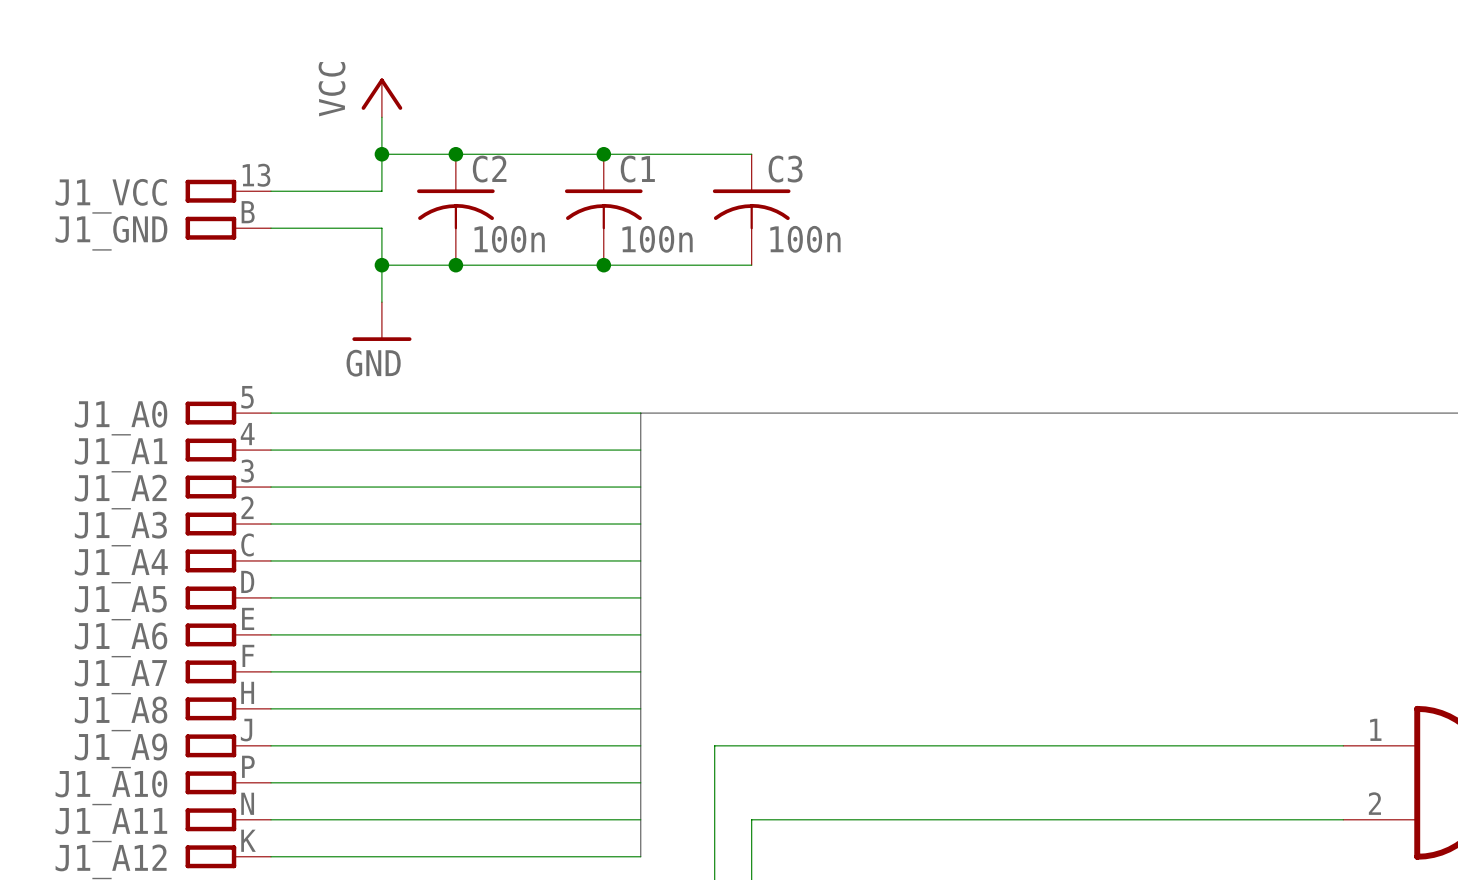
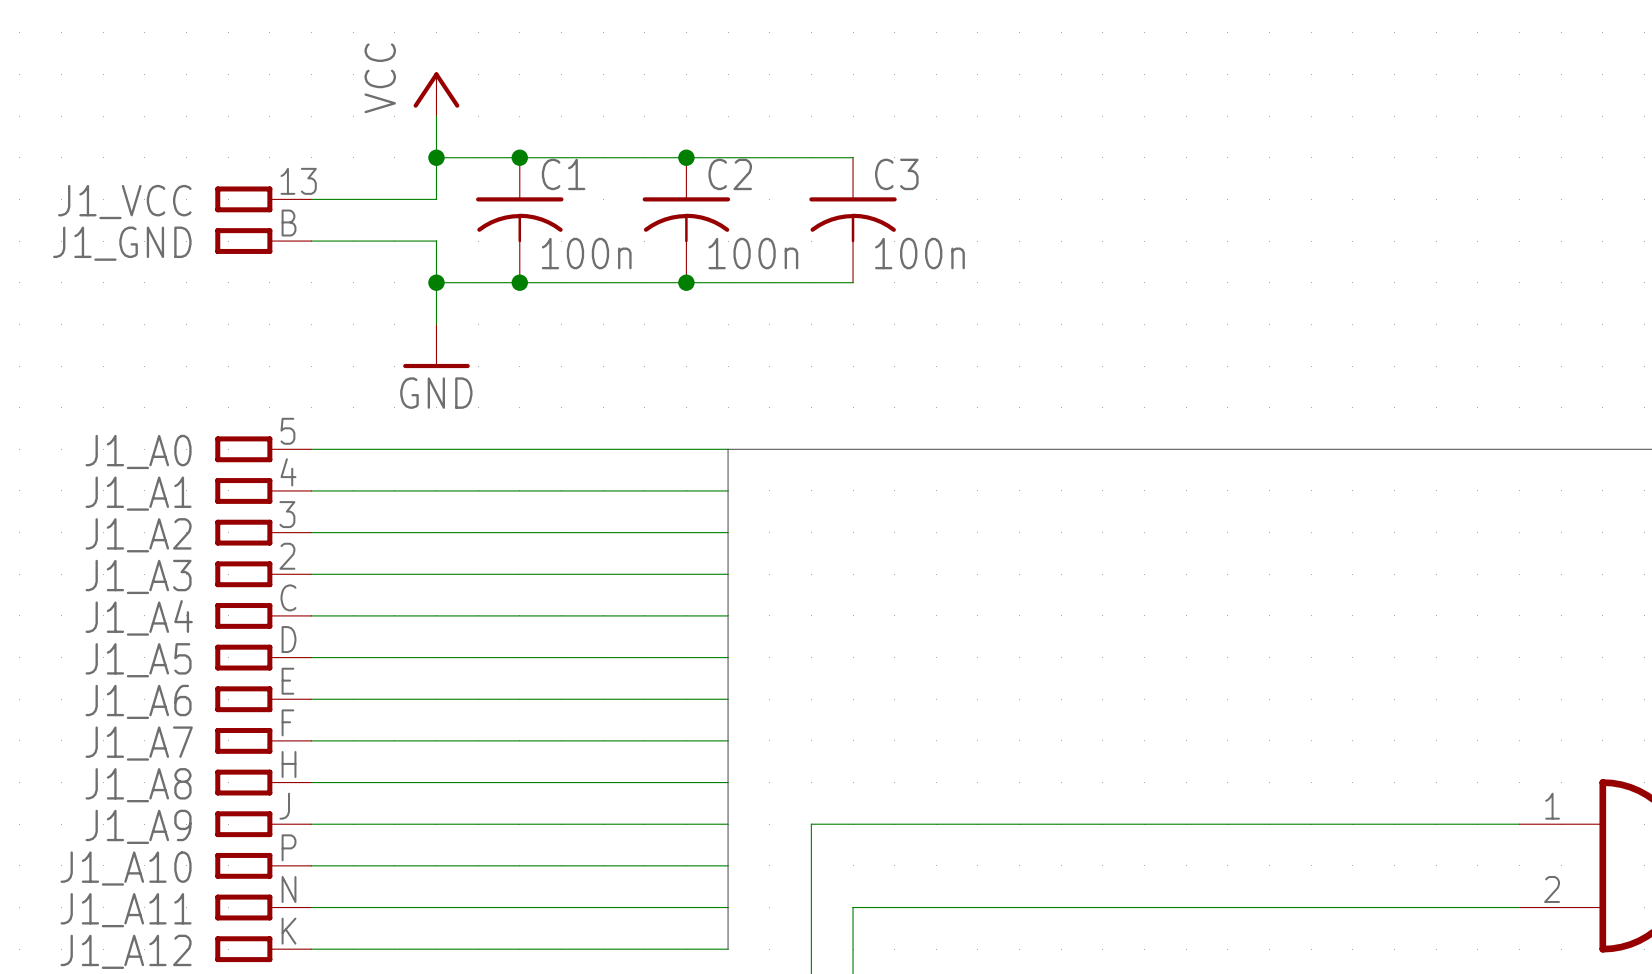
C2 name: C2 (489, 169) -> C1 (563, 174)
C1 name: C1 (637, 169) -> C2 (730, 174)

